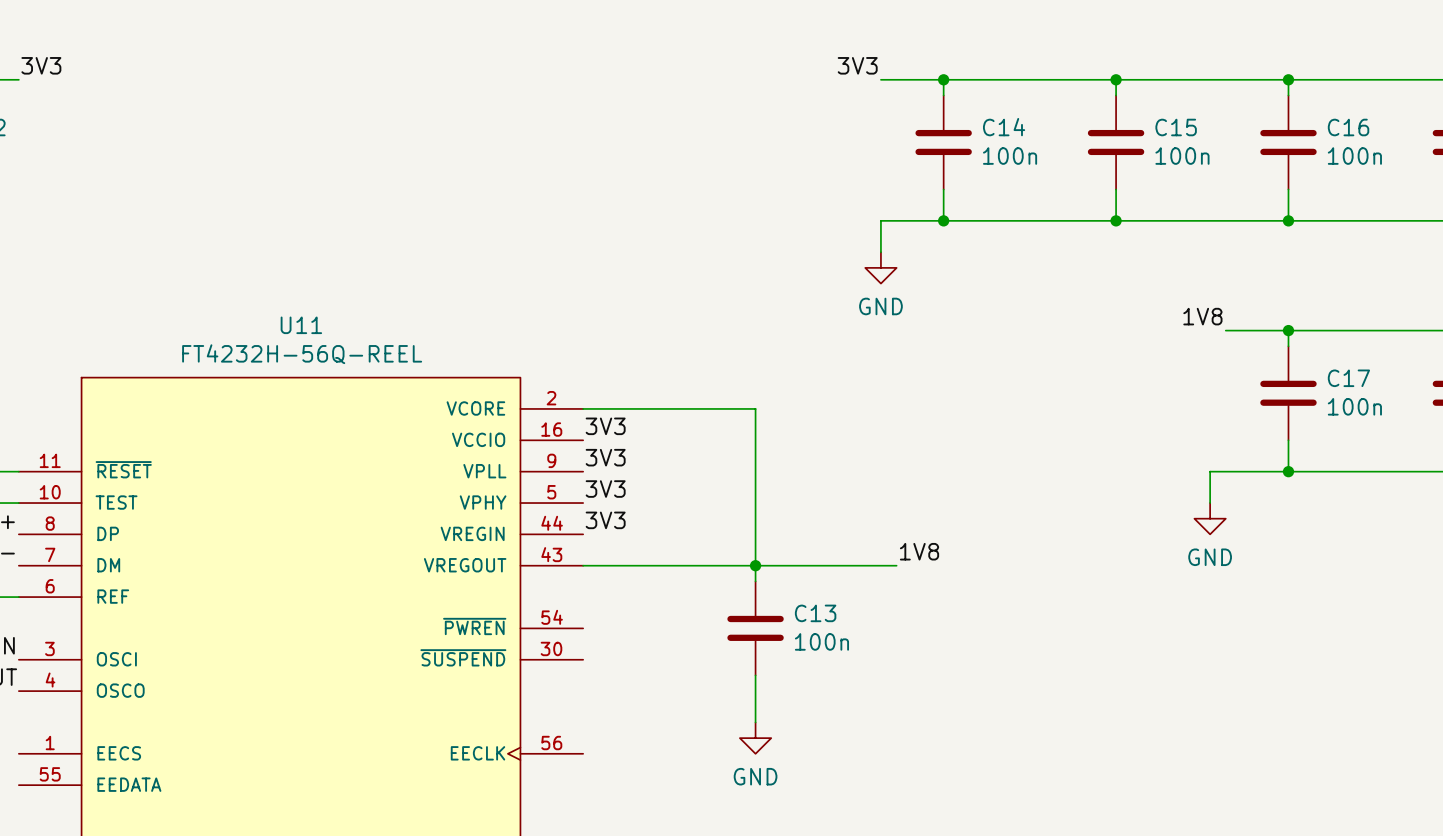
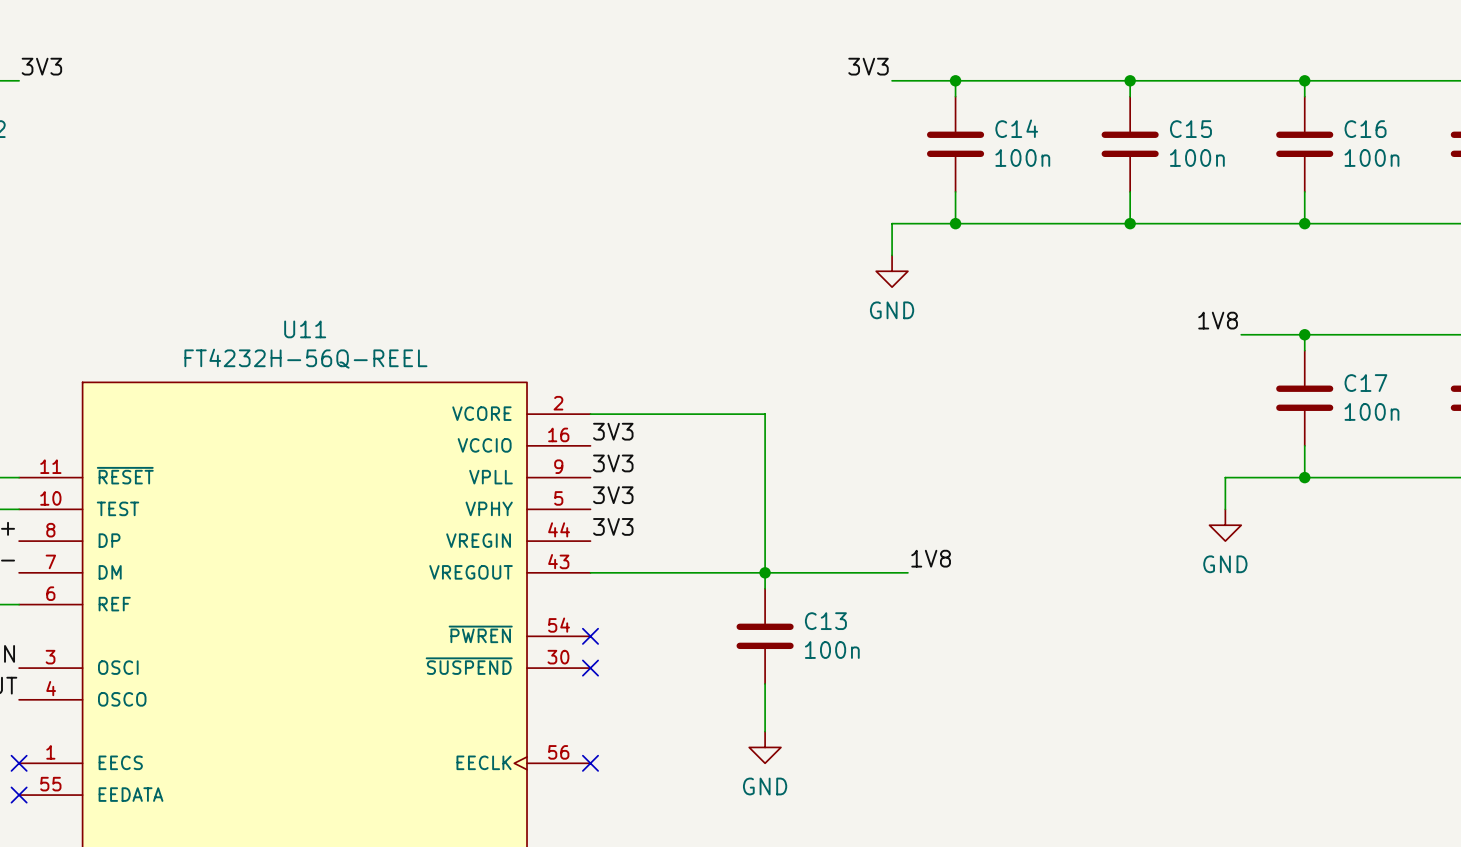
no-connect mark: none -> (590, 636)
no-connect mark: none -> (590, 668)
no-connect mark: none -> (19, 763)
no-connect mark: none -> (590, 763)
no-connect mark: none -> (19, 795)

